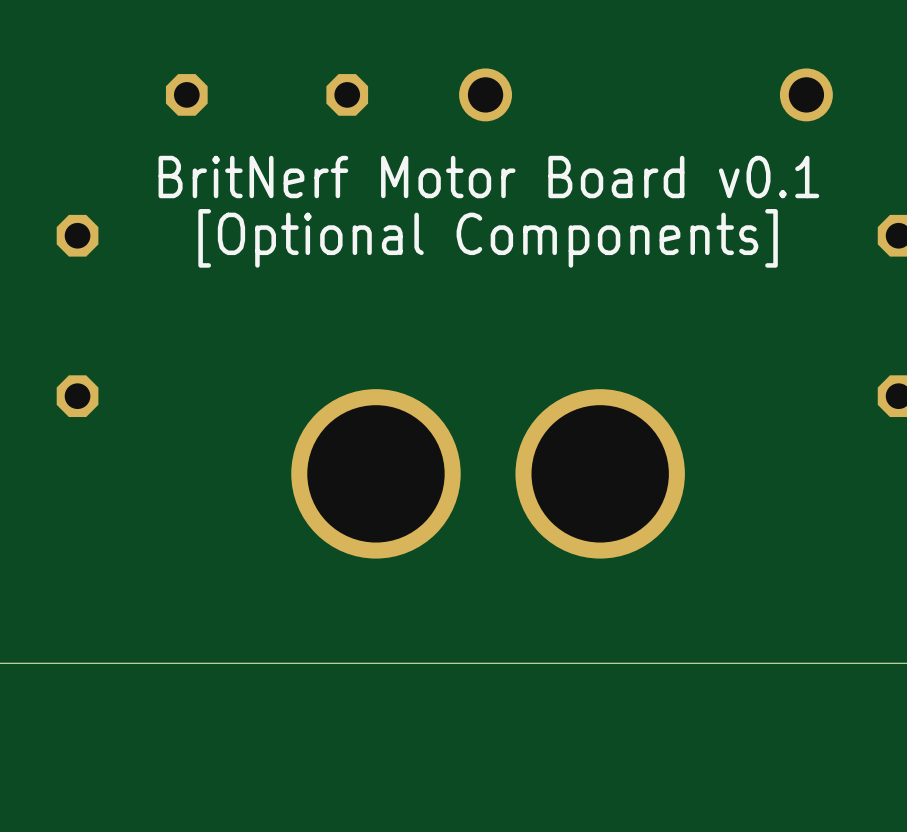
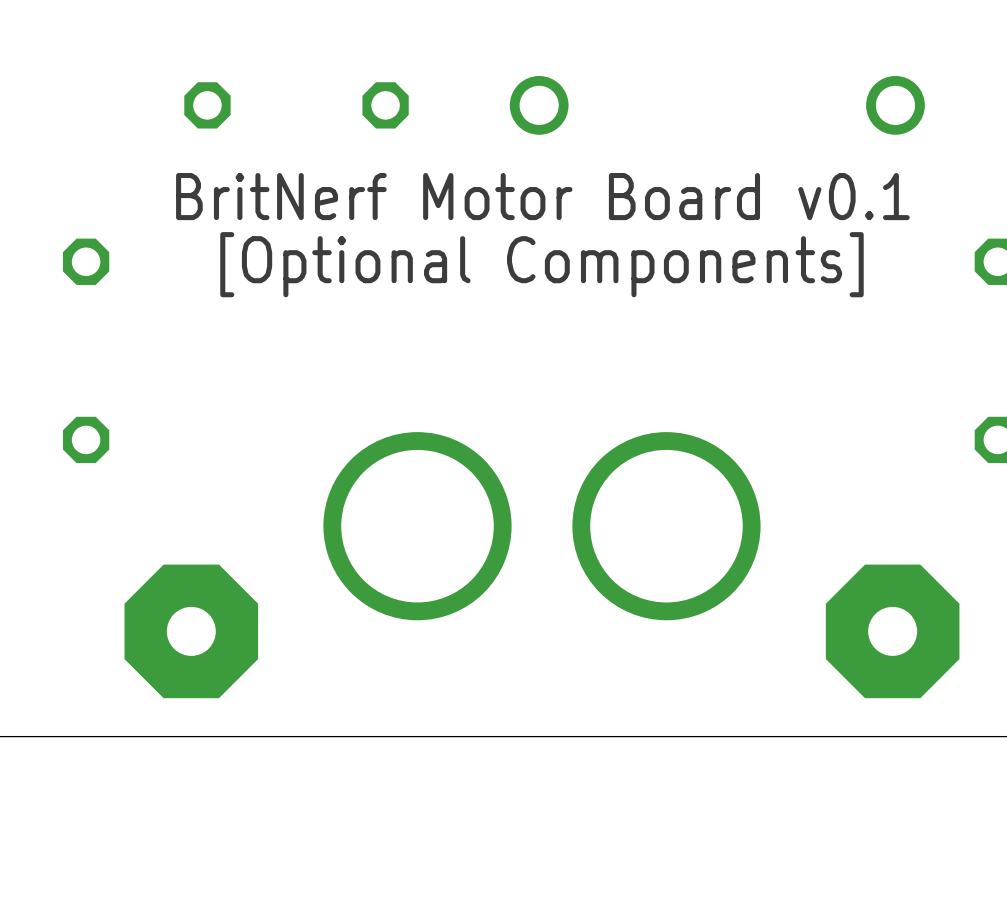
part: none -> (191, 631)
part: none -> (892, 631)

